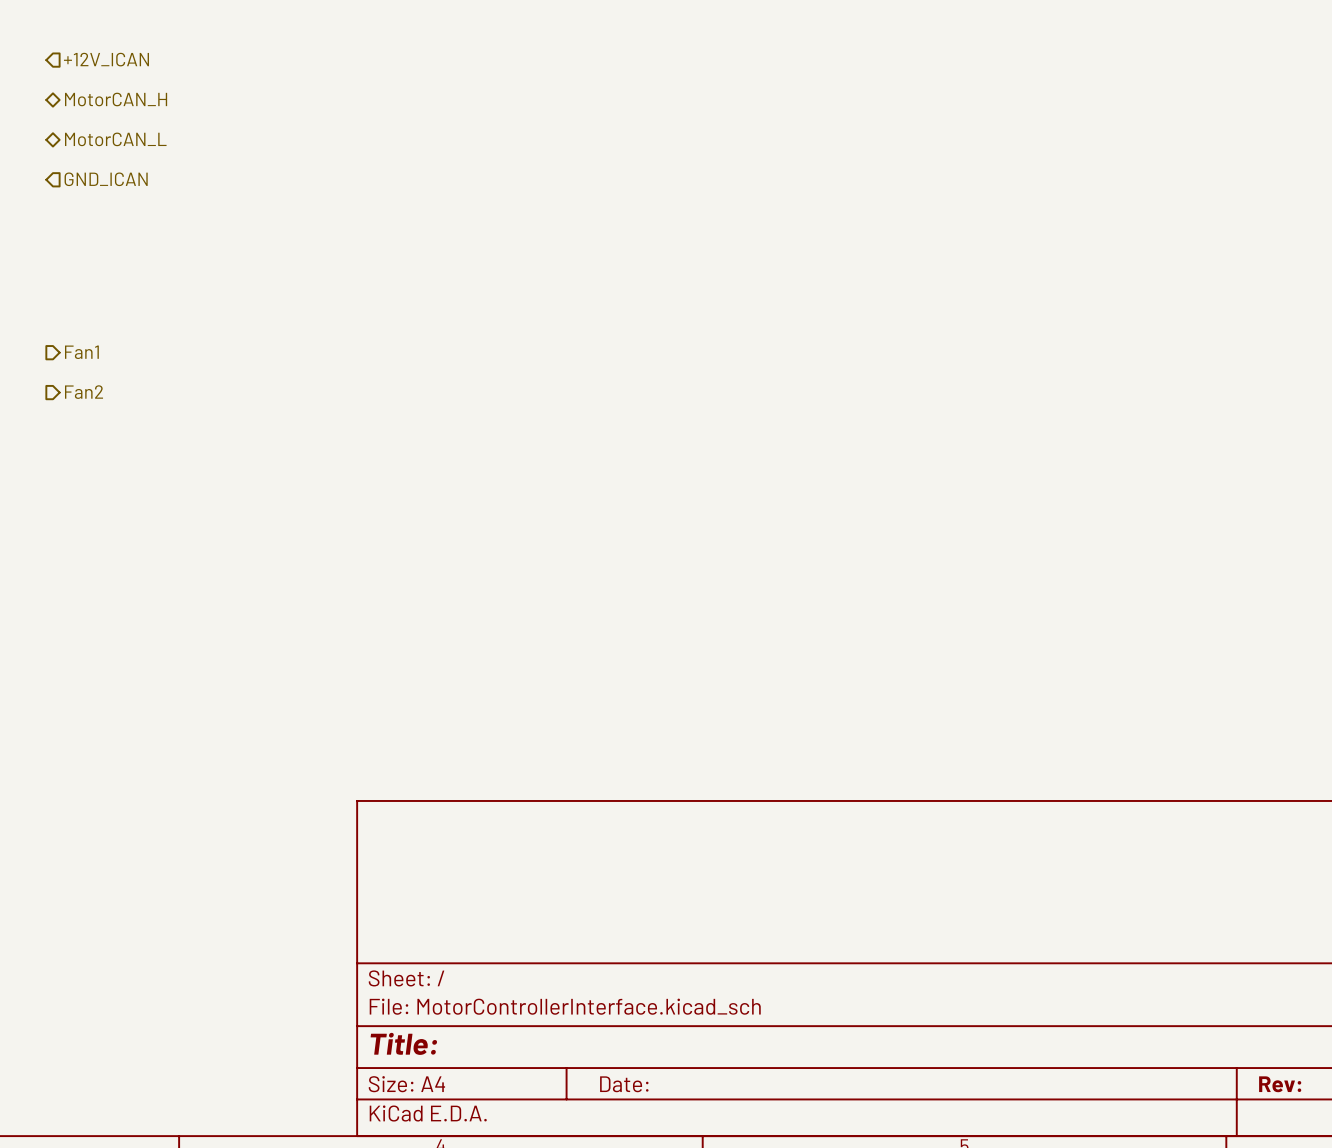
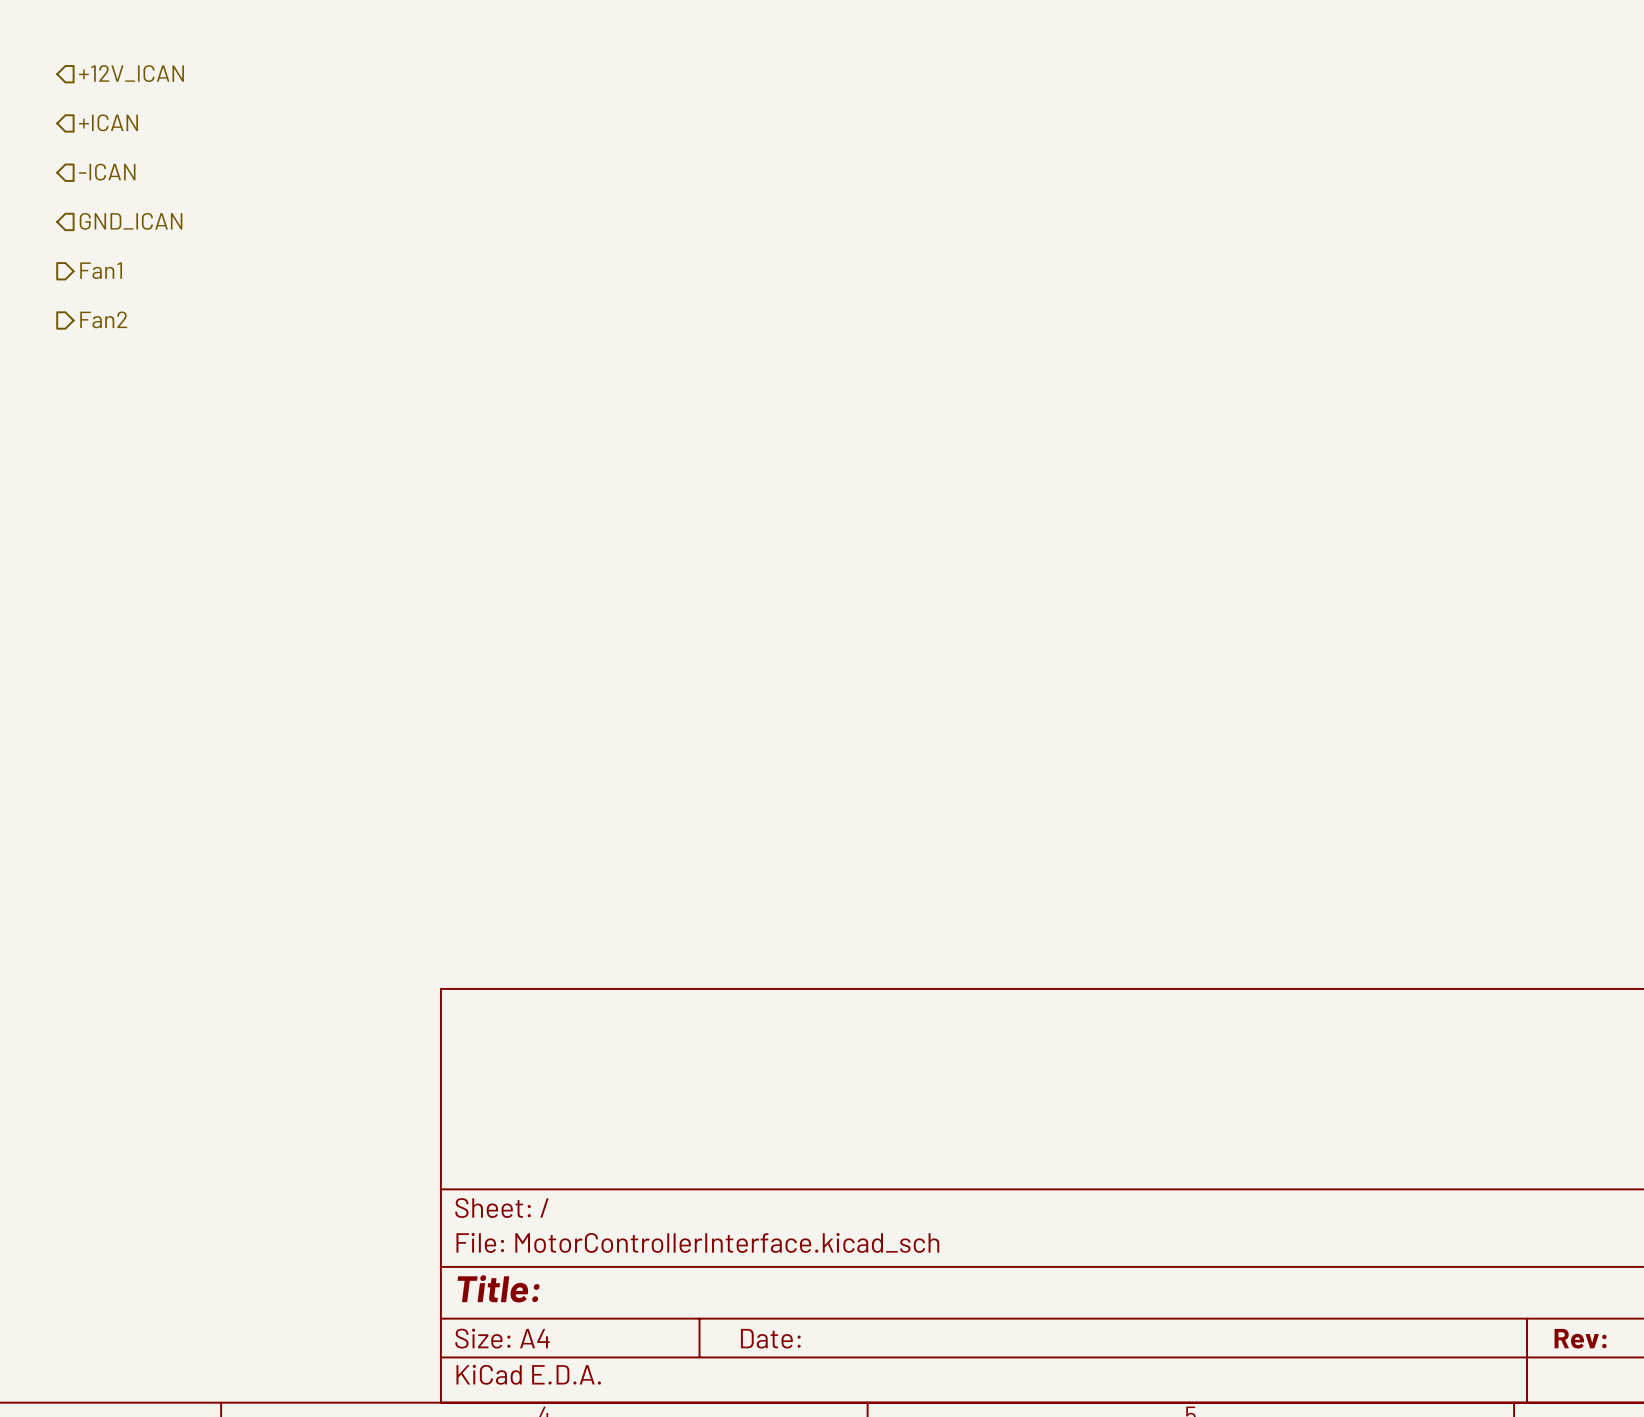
hierarchical label shape: bidirectional (116, 99) -> input (108, 122)
hierarchical label: MotorCAN_H (116, 99) -> +ICAN (108, 122)
hierarchical label shape: bidirectional (115, 139) -> input (107, 172)
hierarchical label: MotorCAN_L (115, 139) -> -ICAN (107, 172)
hierarchical label position: Fan1 (81, 352) -> Fan1 (101, 270)
hierarchical label position: Fan2 (84, 392) -> Fan2 (103, 319)

